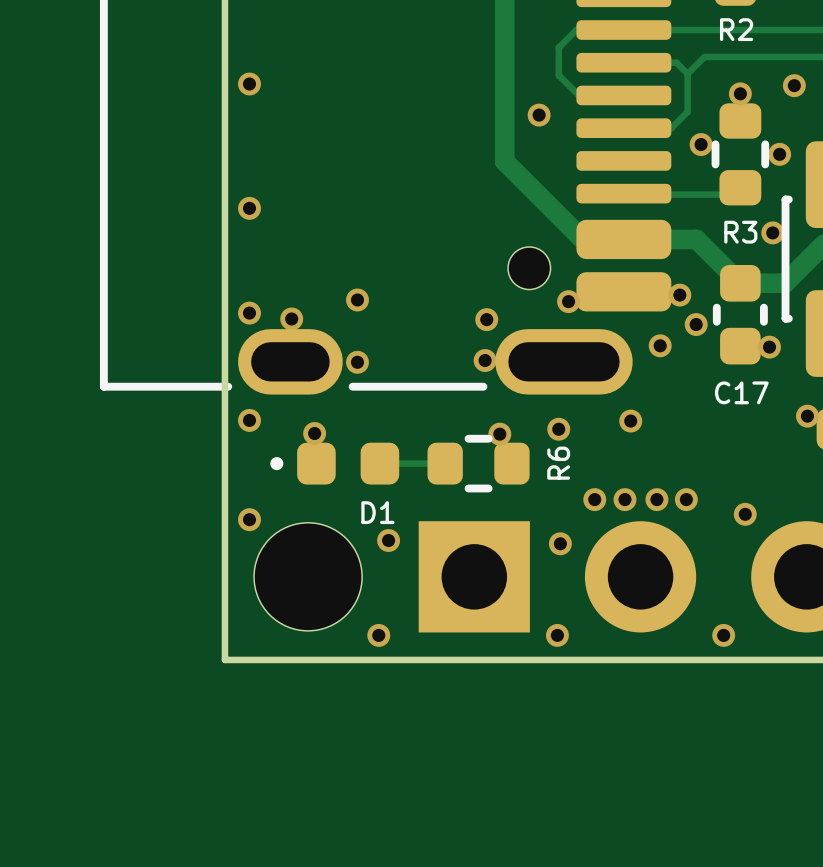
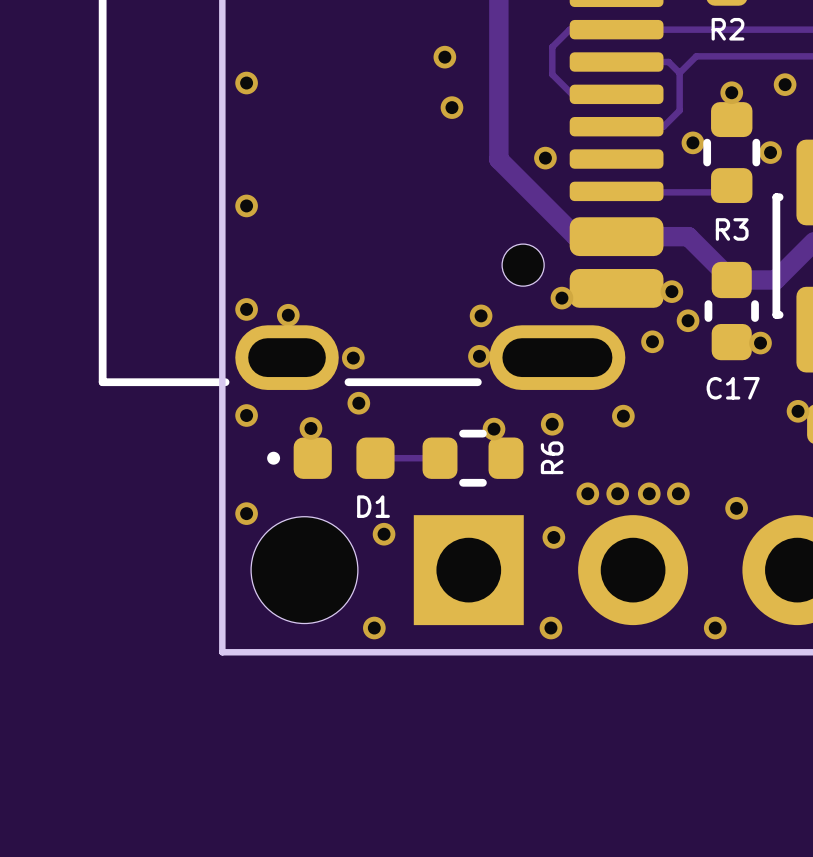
via: none -> (444, 57)
via: none -> (451, 107)
via: (539, 115) -> none
via: none -> (545, 158)
via: (772, 232) -> none
via: (357, 299) -> none
via: none -> (358, 403)

